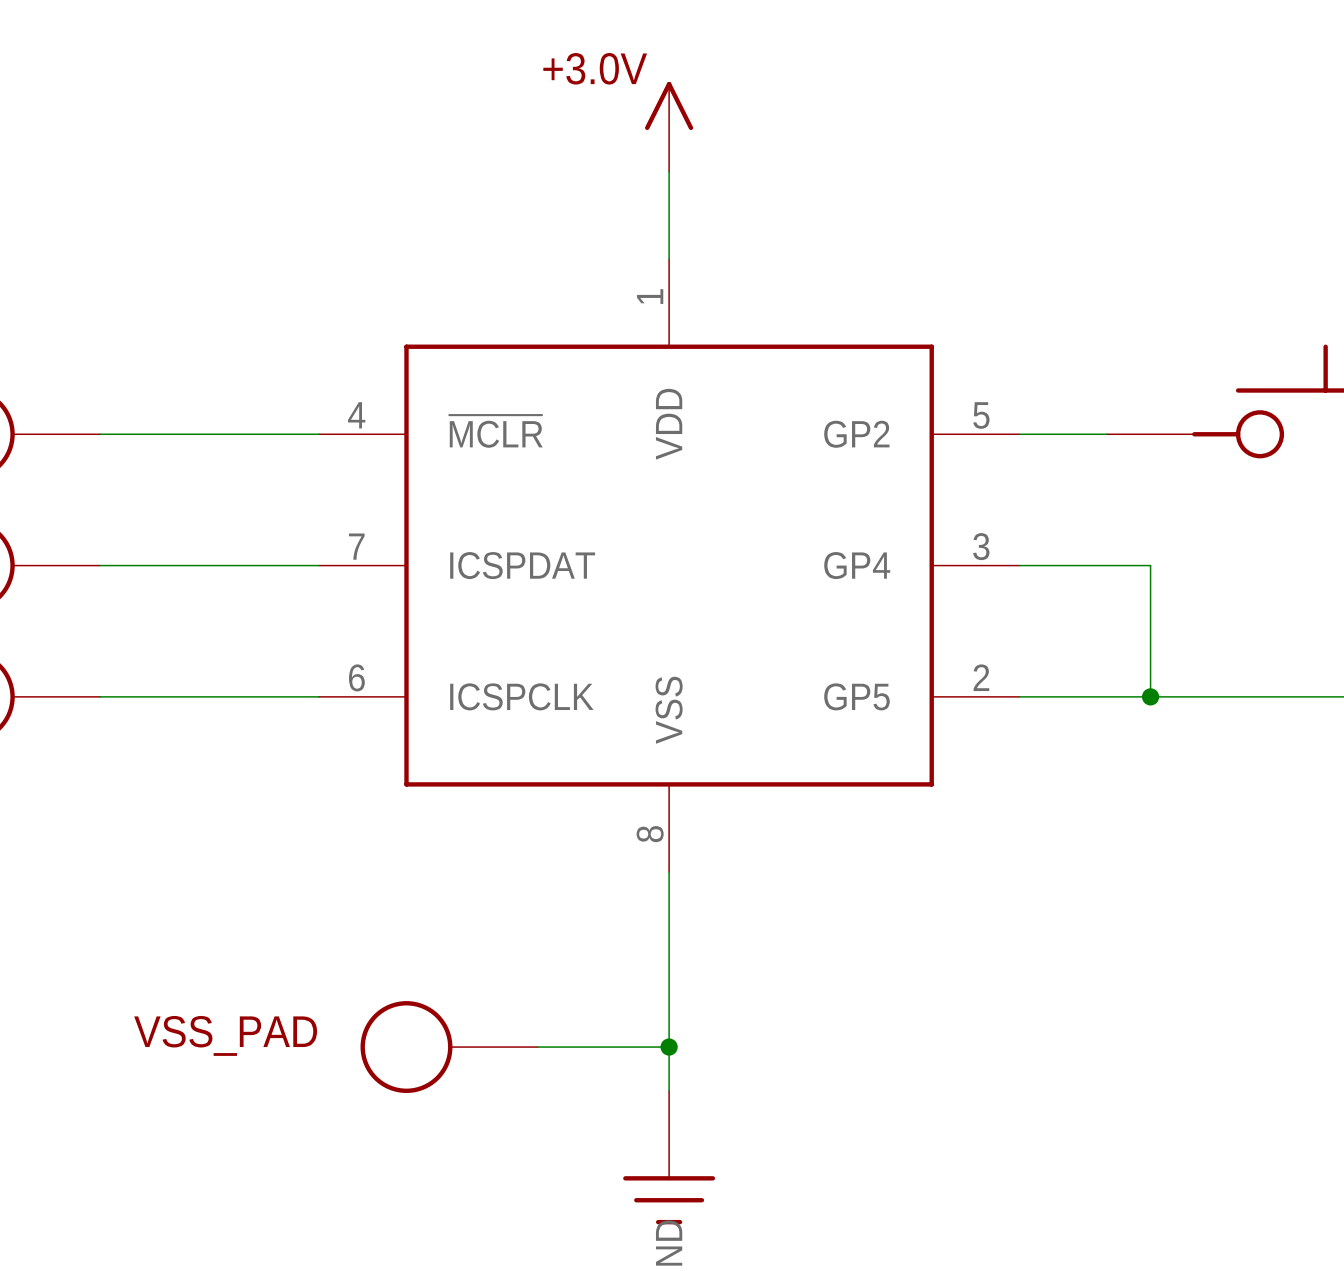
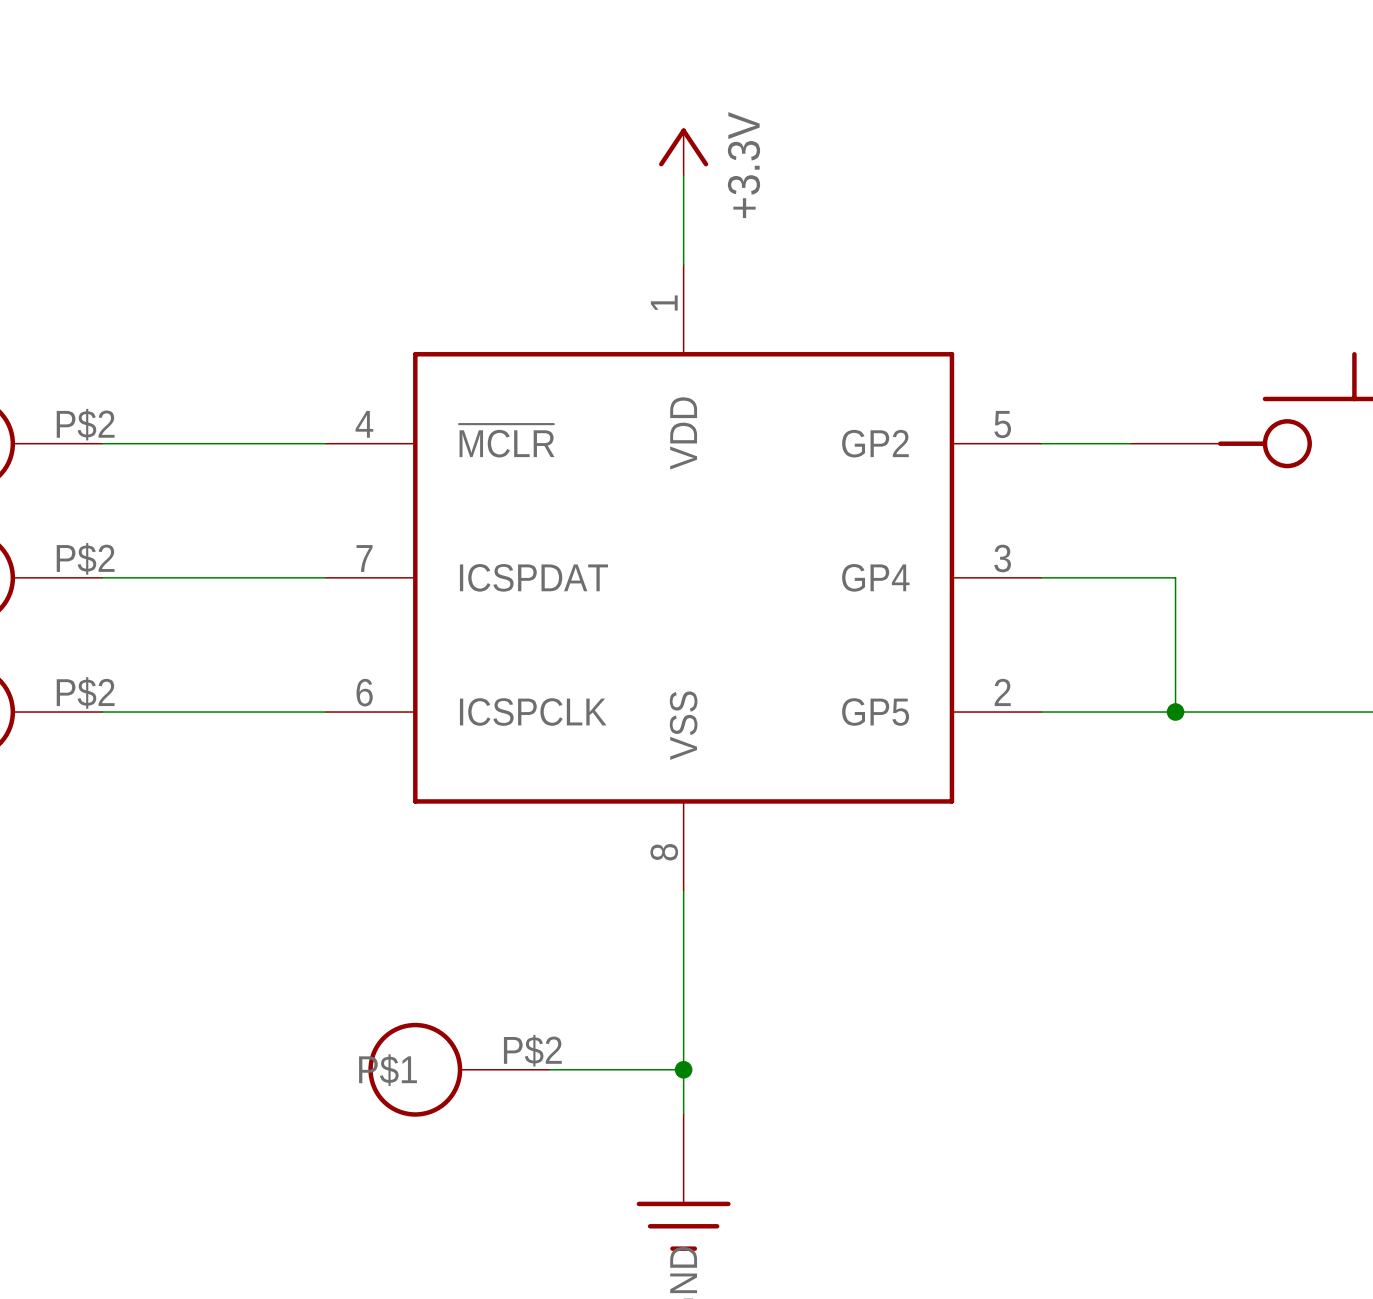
power symbol: +3.0V (669, 126) -> none
power symbol: none -> +3.3V (683, 151)
part pin number: none -> P$2 (85, 424)
part pin number: none -> P$2 (85, 558)
part pin number: none -> P$2 (85, 692)
VSS_PAD pin number: none -> P$2 (532, 1050)
VSS_PAD name: VSS_PAD (225, 1035) -> none
VSS_PAD pin name: none -> P$1 (388, 1070)

